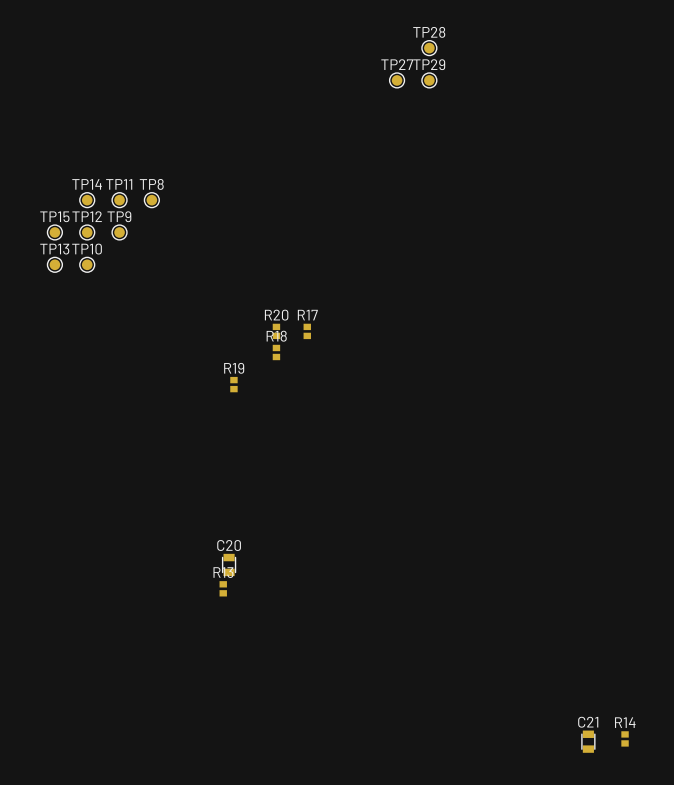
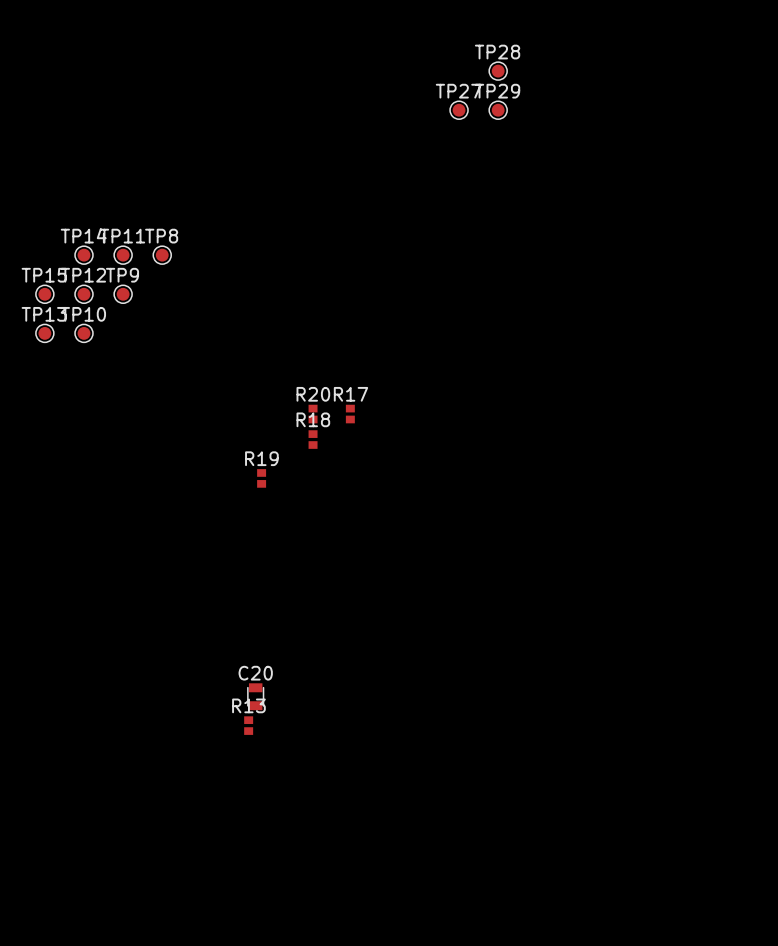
R14: (625, 738) -> none
C21: (588, 741) -> none

